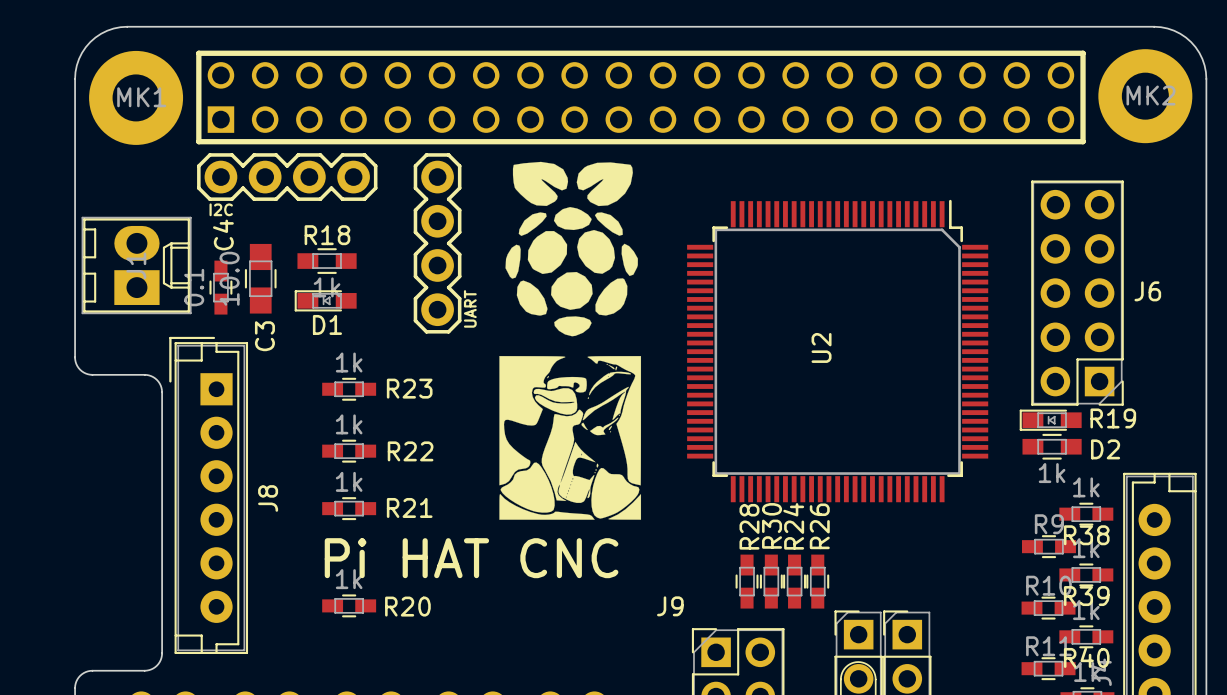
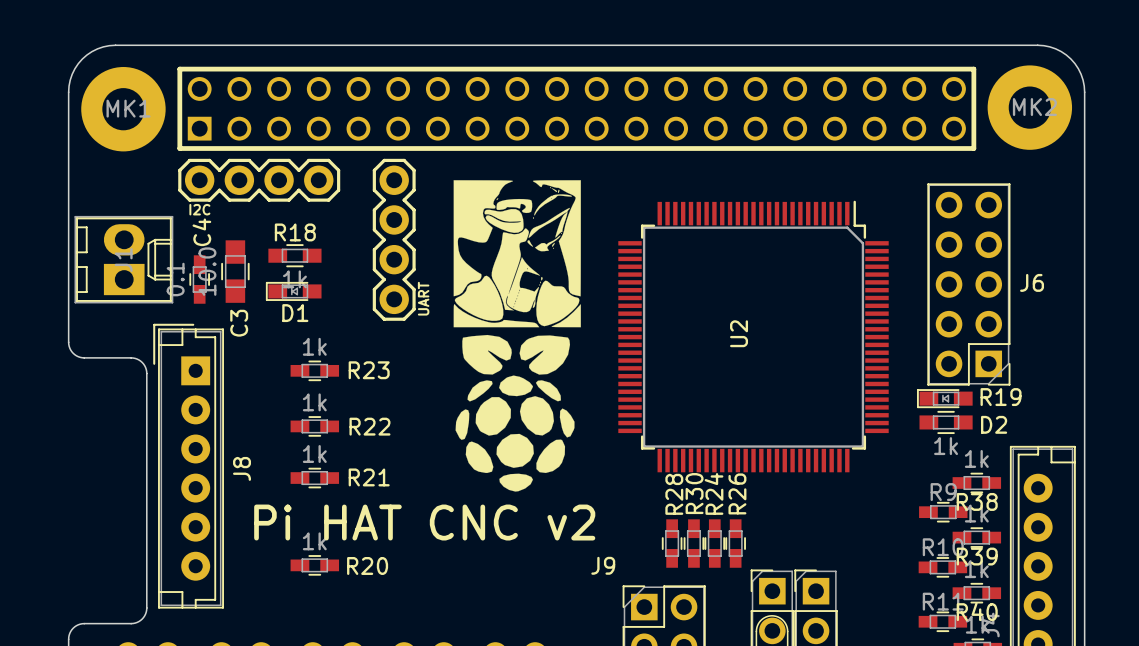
drawing position: (571, 249) -> (515, 413)
drawing position: (570, 437) -> (517, 253)
text: Pi HAT CNC (471, 558) -> Pi HAT CNC v2 (424, 522)

